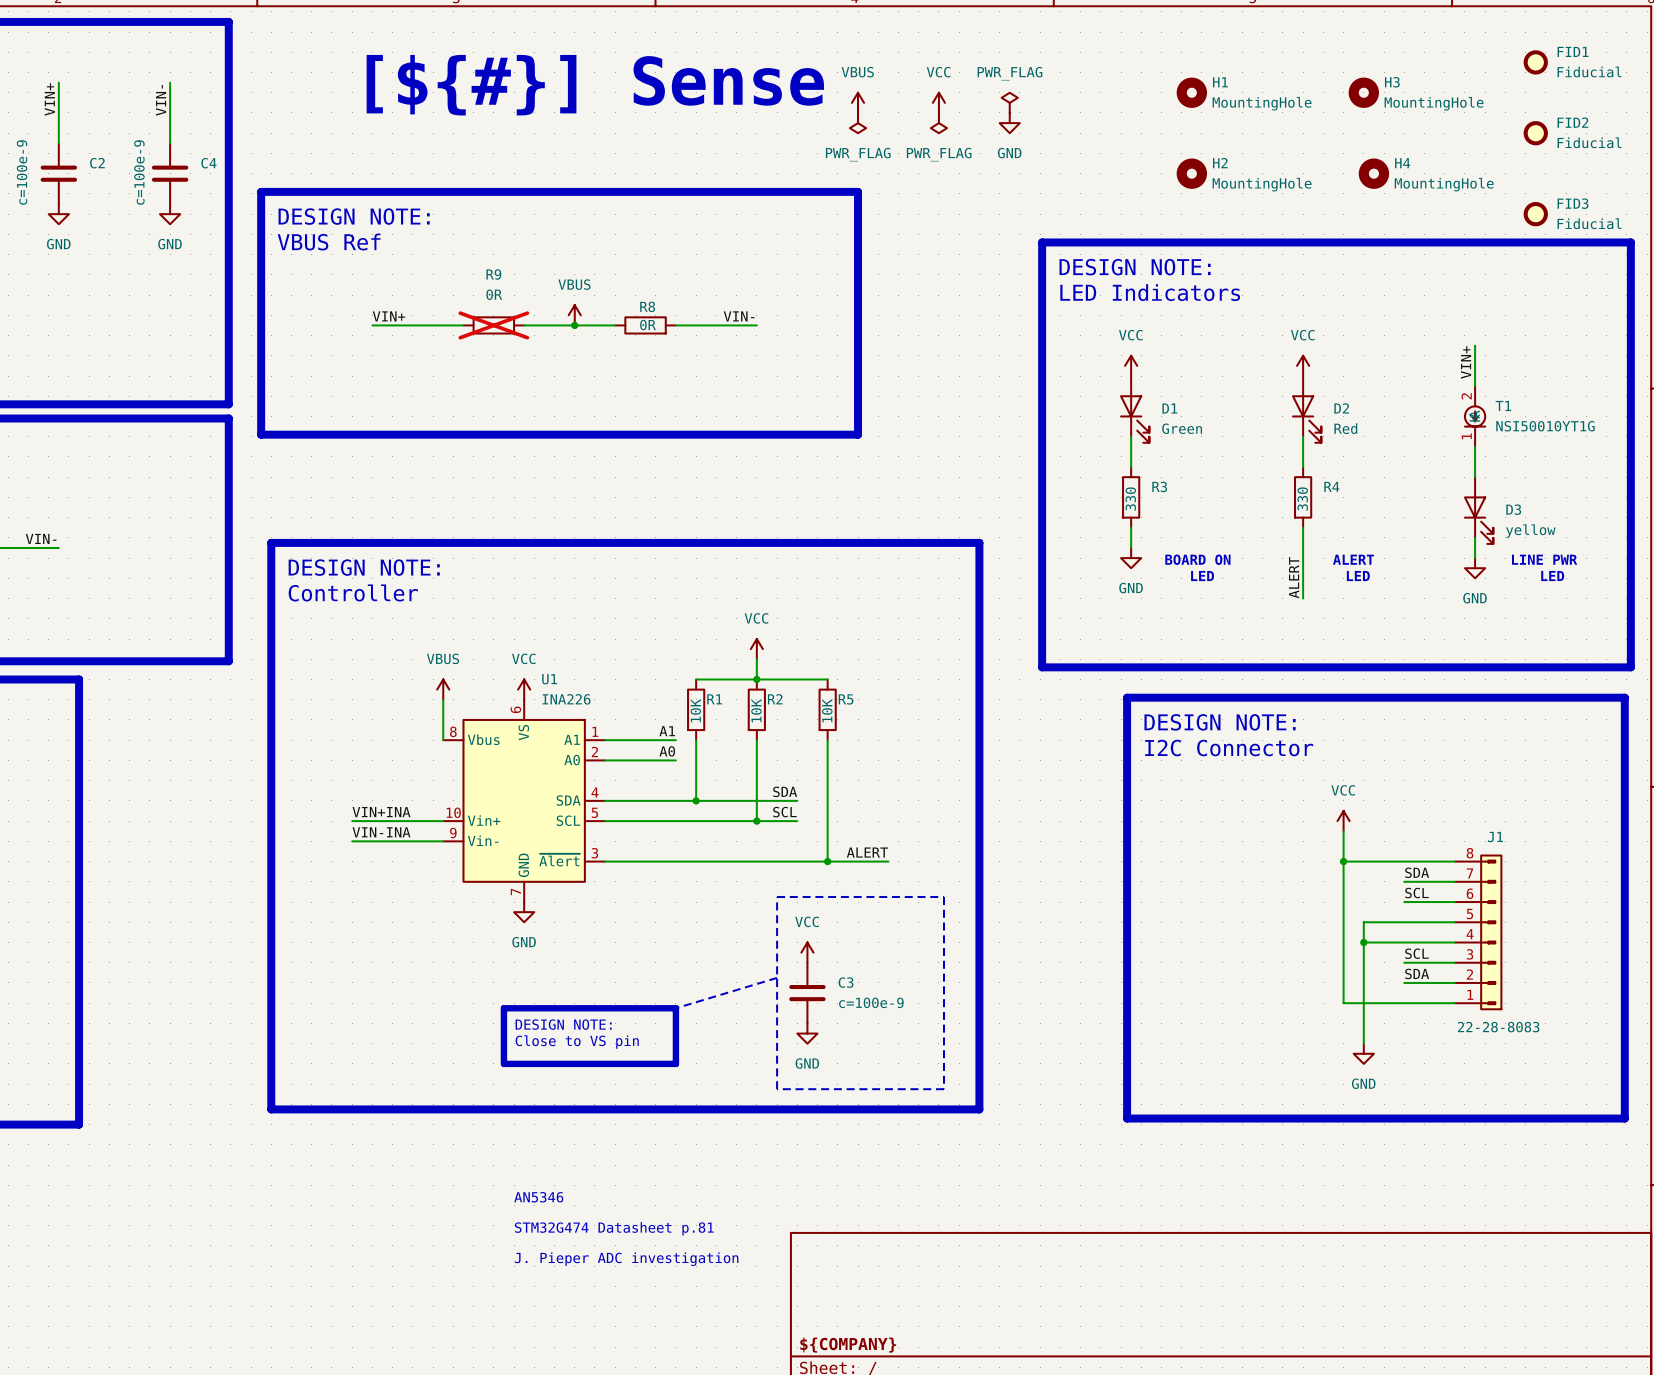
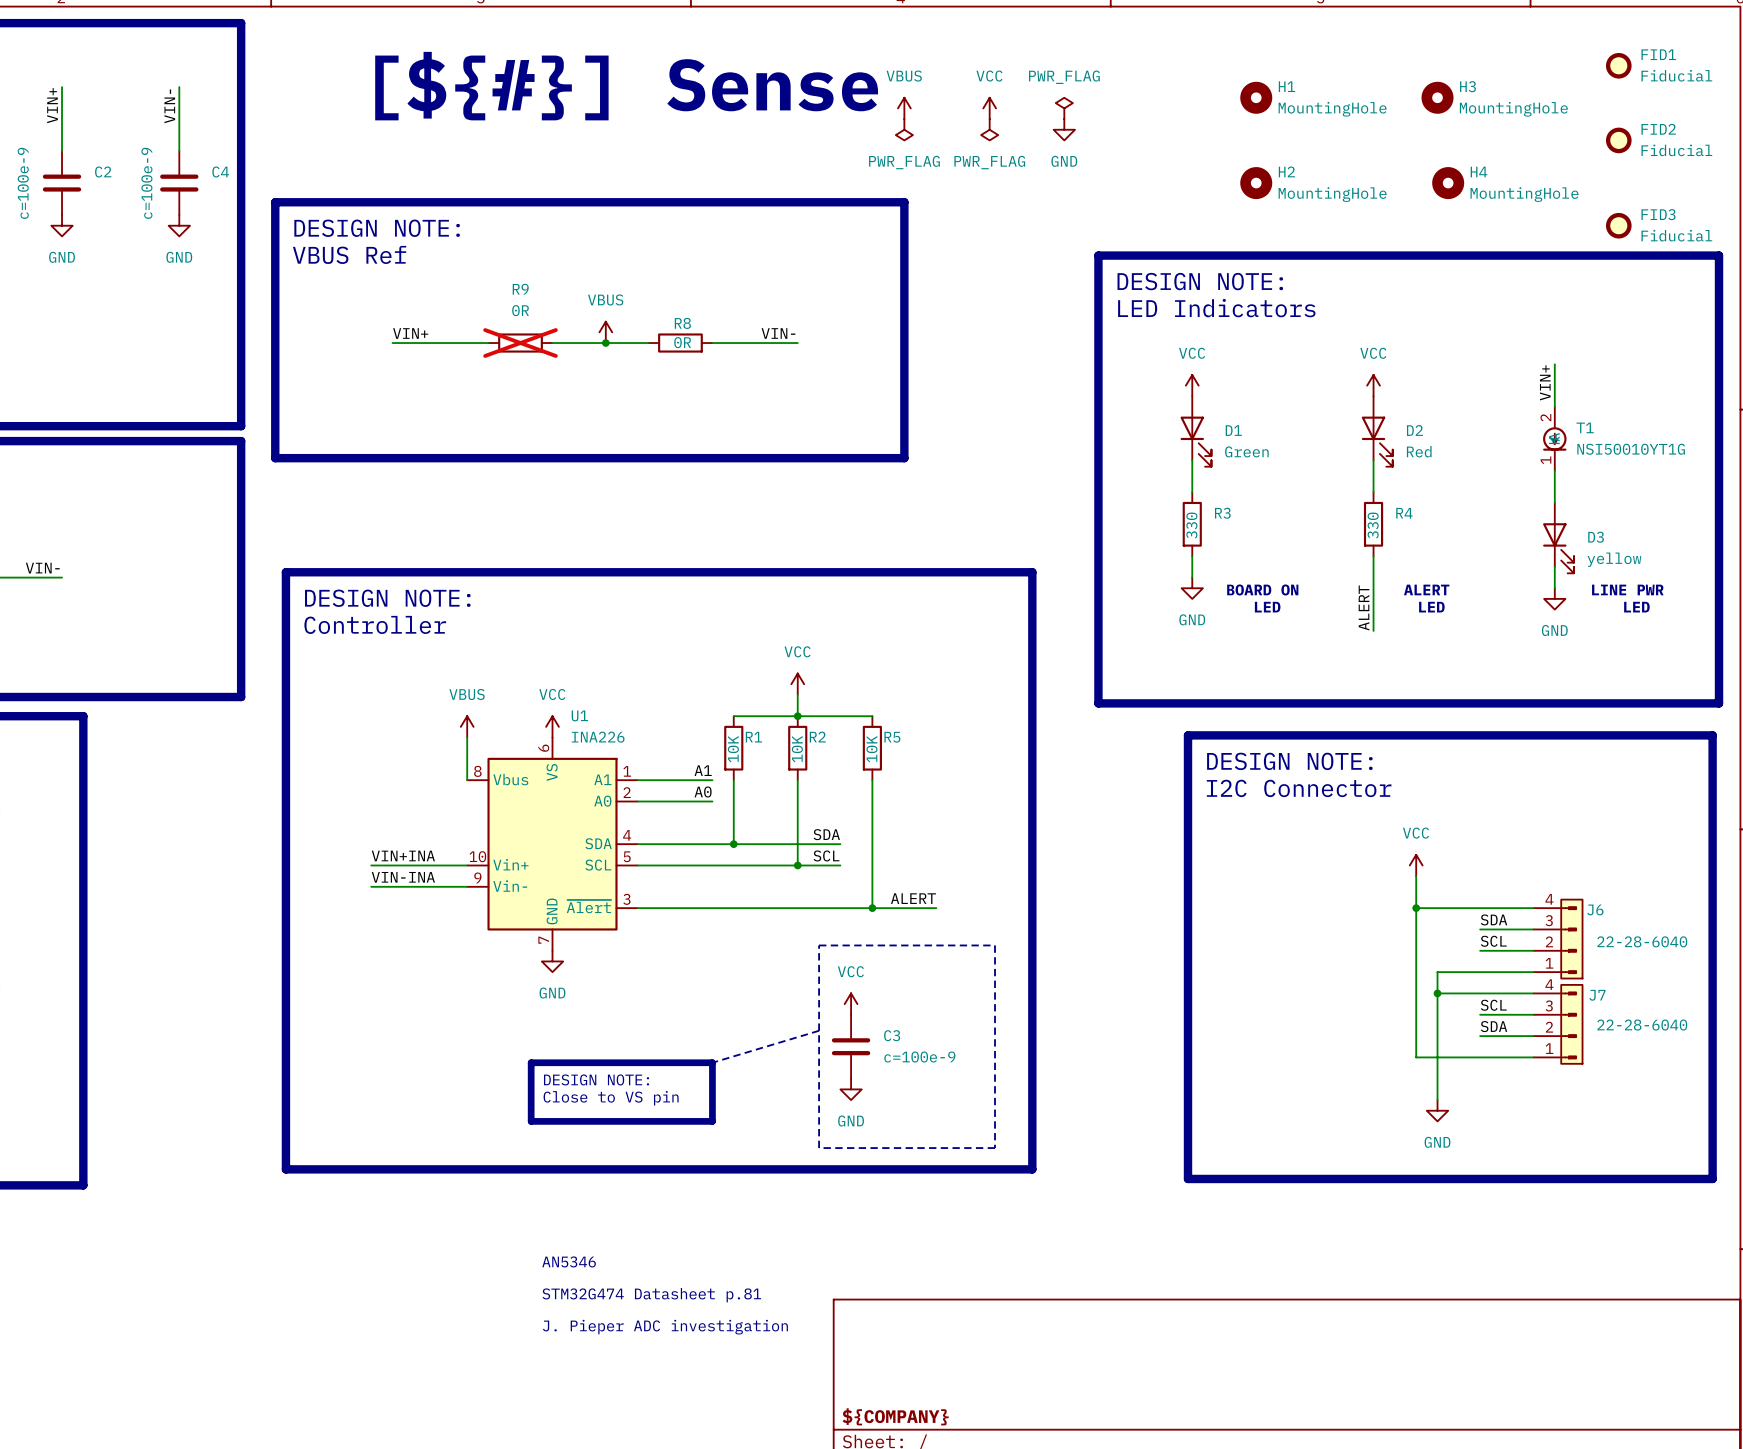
J6: none -> 22-28-6040 (1558, 939)
J1: 22-28-8083 (1478, 932) -> none
J7: none -> 22-28-6040 (1558, 1024)

